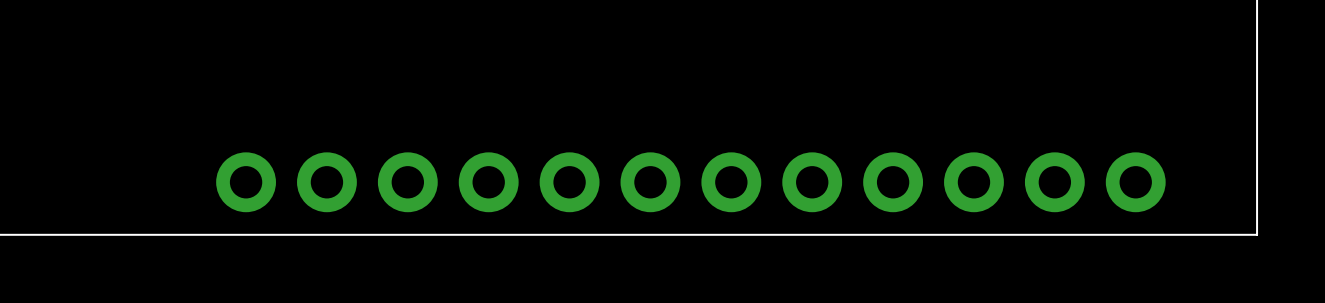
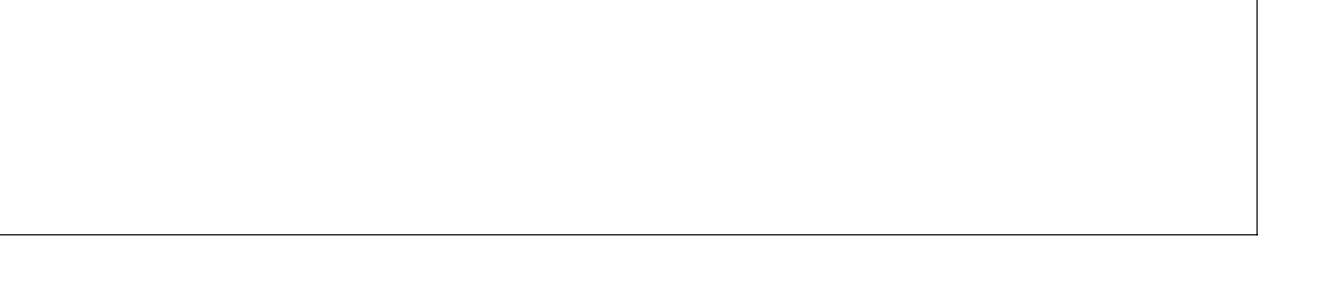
part: (690, 182) -> none

